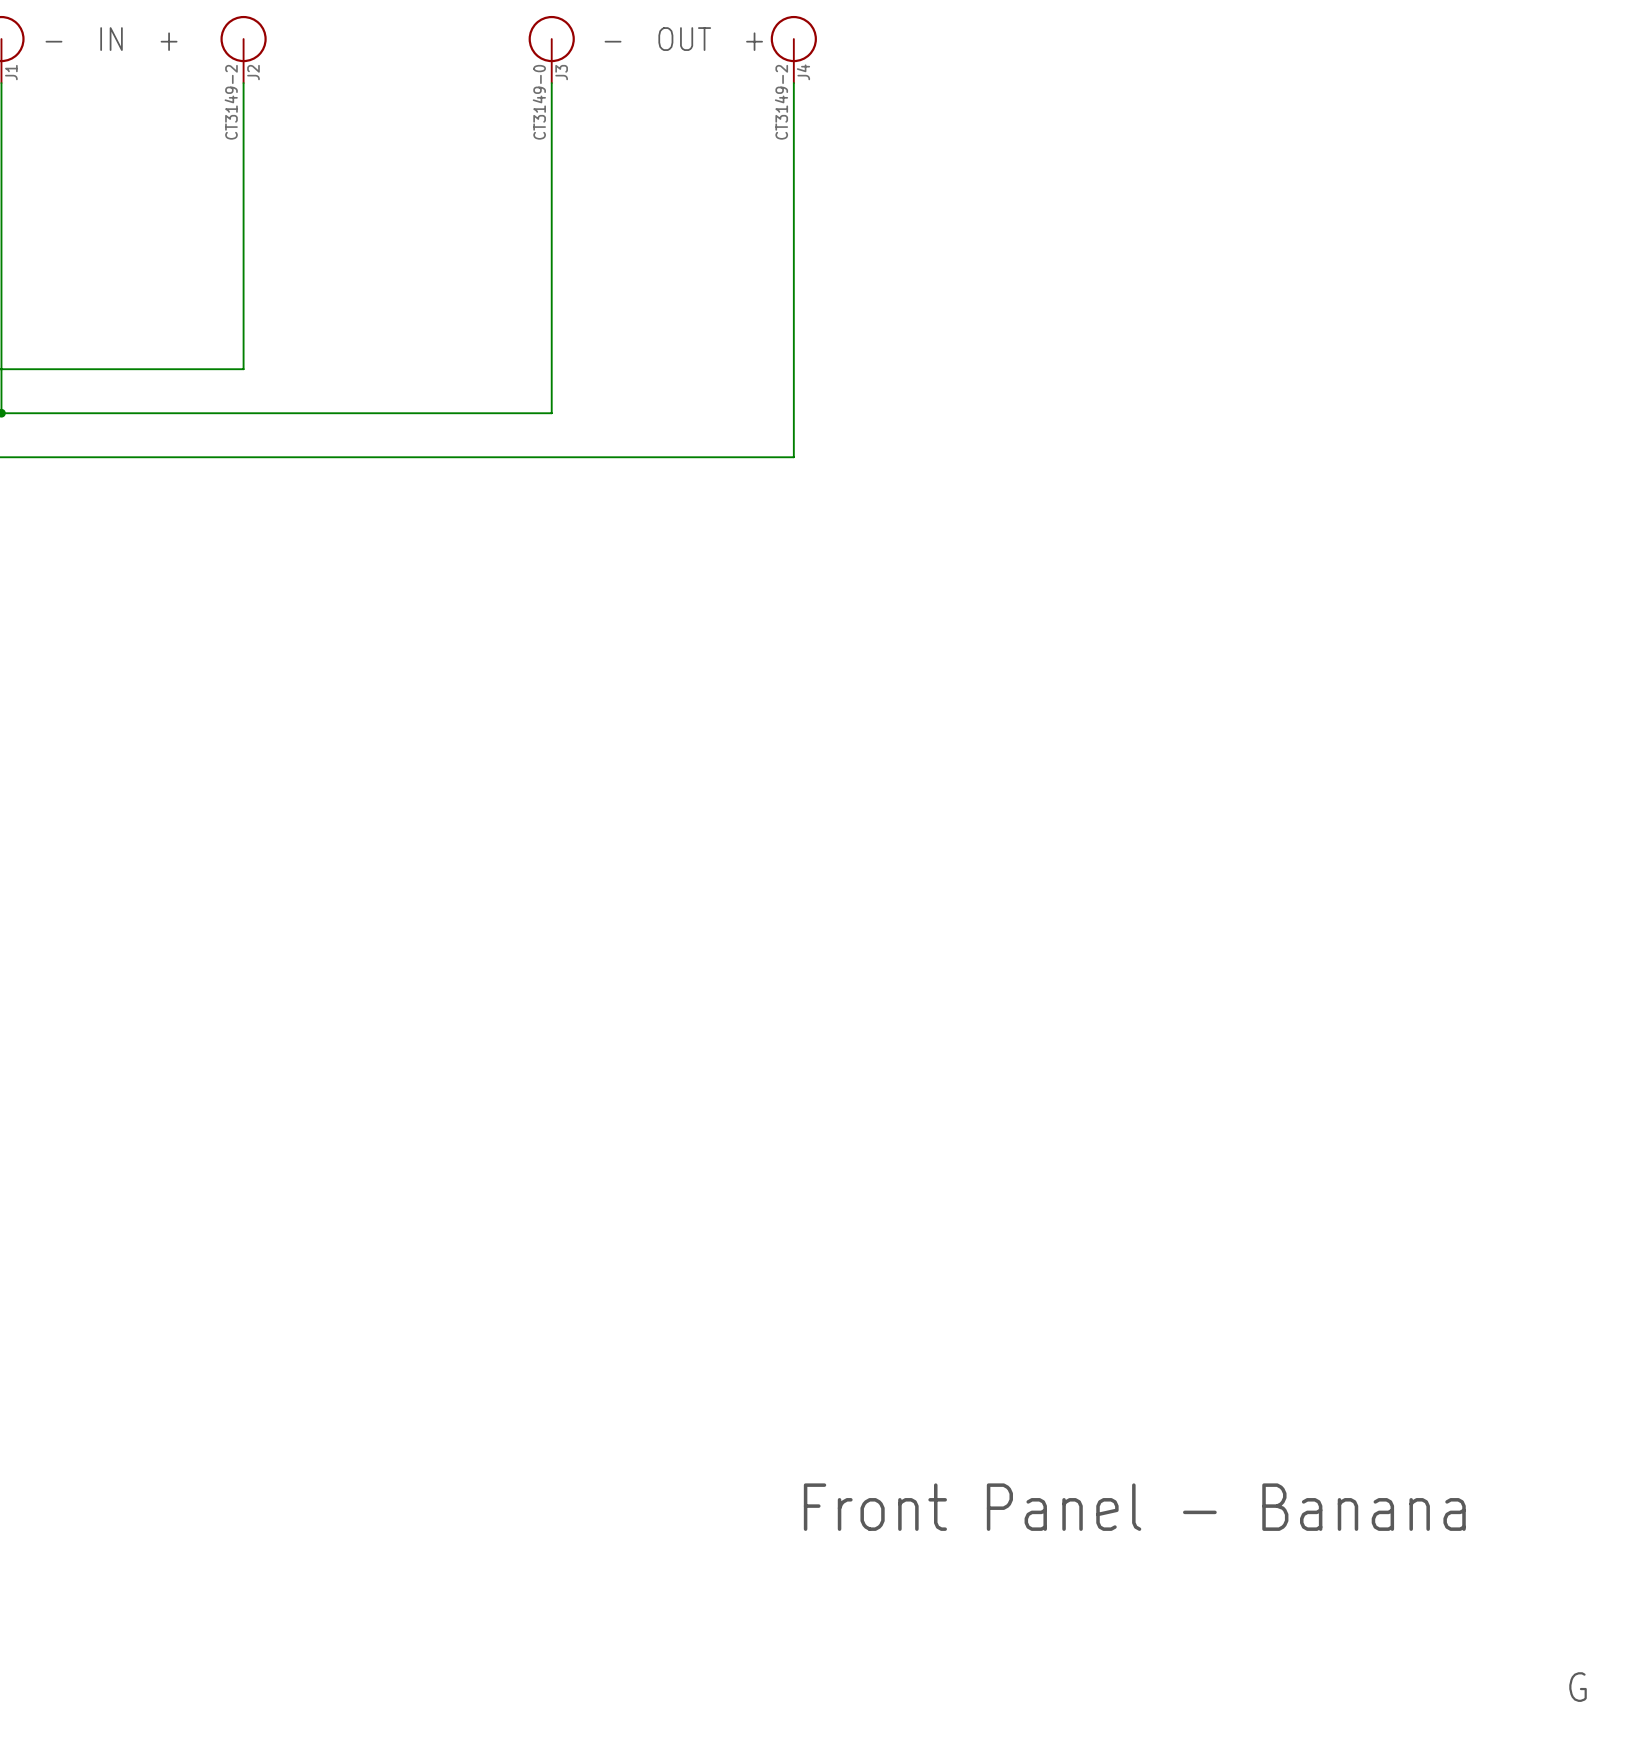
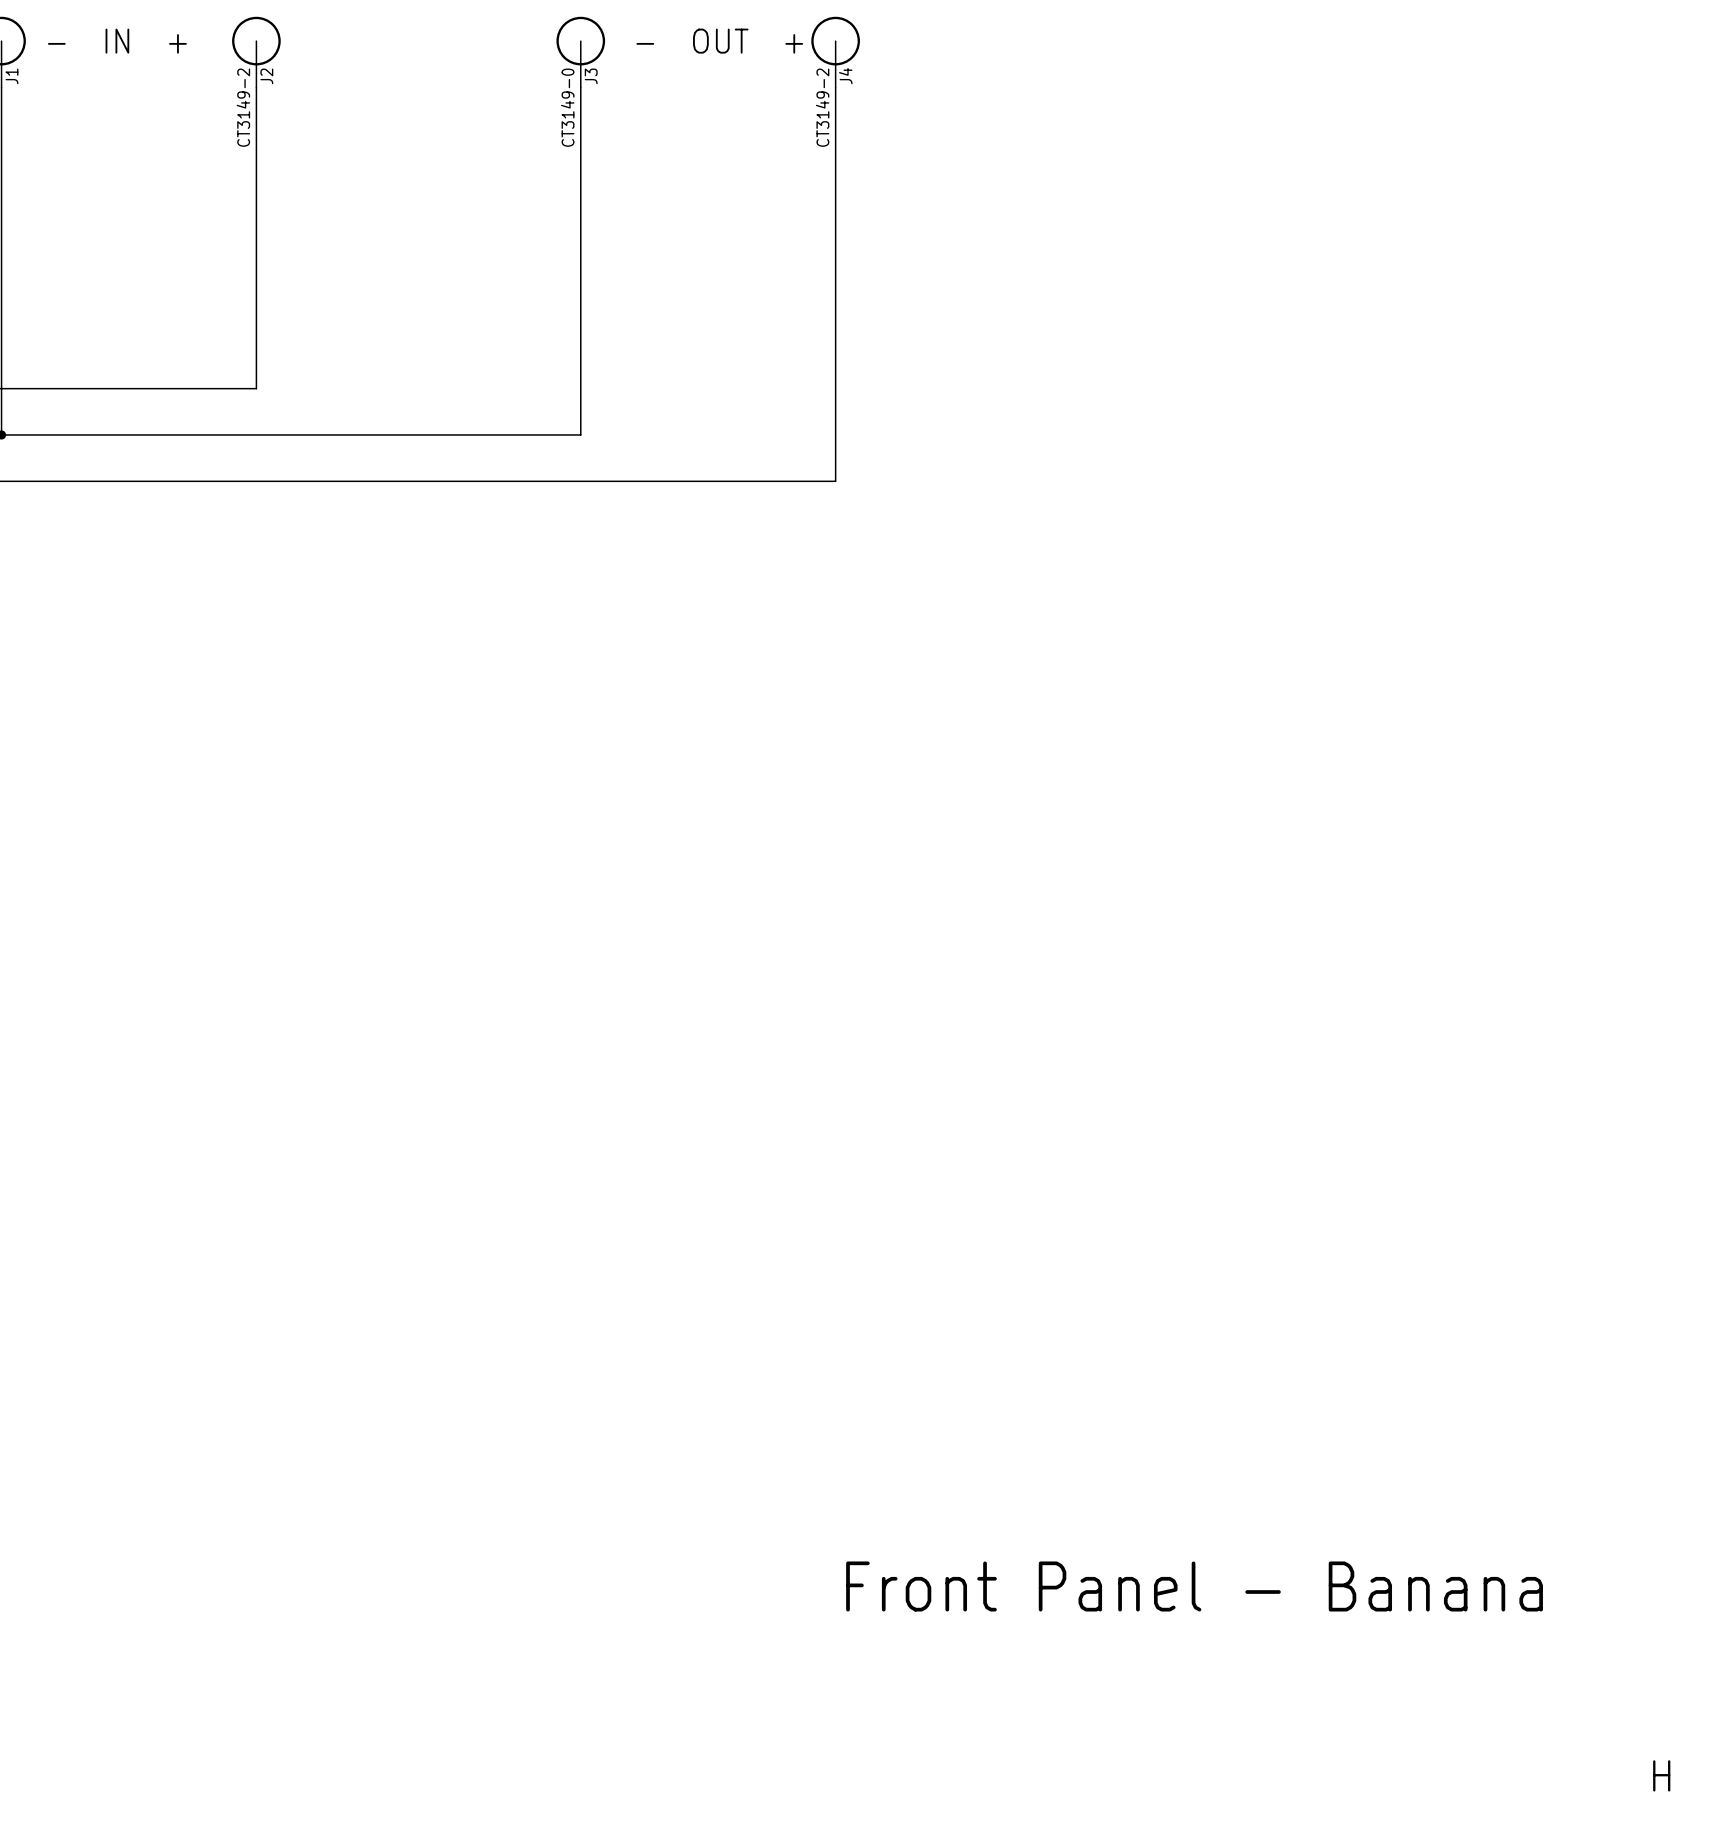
text: G (1578, 1687) -> H (1661, 1775)

